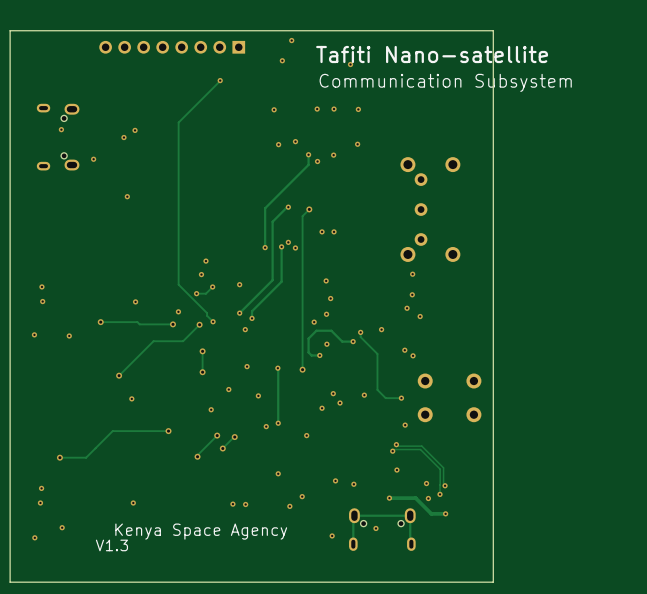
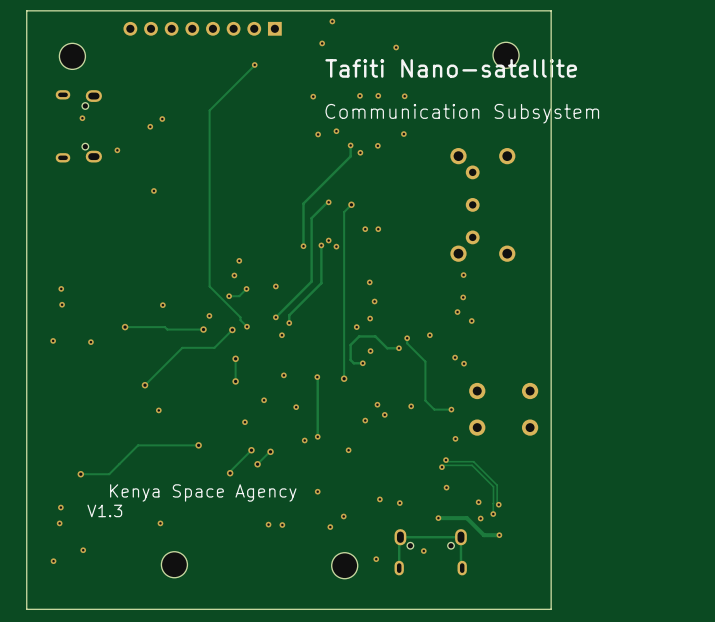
text position: Tafiti Nano-satellite (432, 54) -> Tafiti Nano-satellite (451, 68)
part: none -> (506, 55)
part: none -> (72, 56)
text position: Communication Subsystem (445, 82) -> Communication Subsystem (462, 113)
text position: Kenya Space Agency (201, 531) -> Kenya Space Agency (203, 492)
part: none -> (174, 564)
part: none -> (344, 565)
text position: V1.3 (111, 545) -> V1.3 (104, 510)

